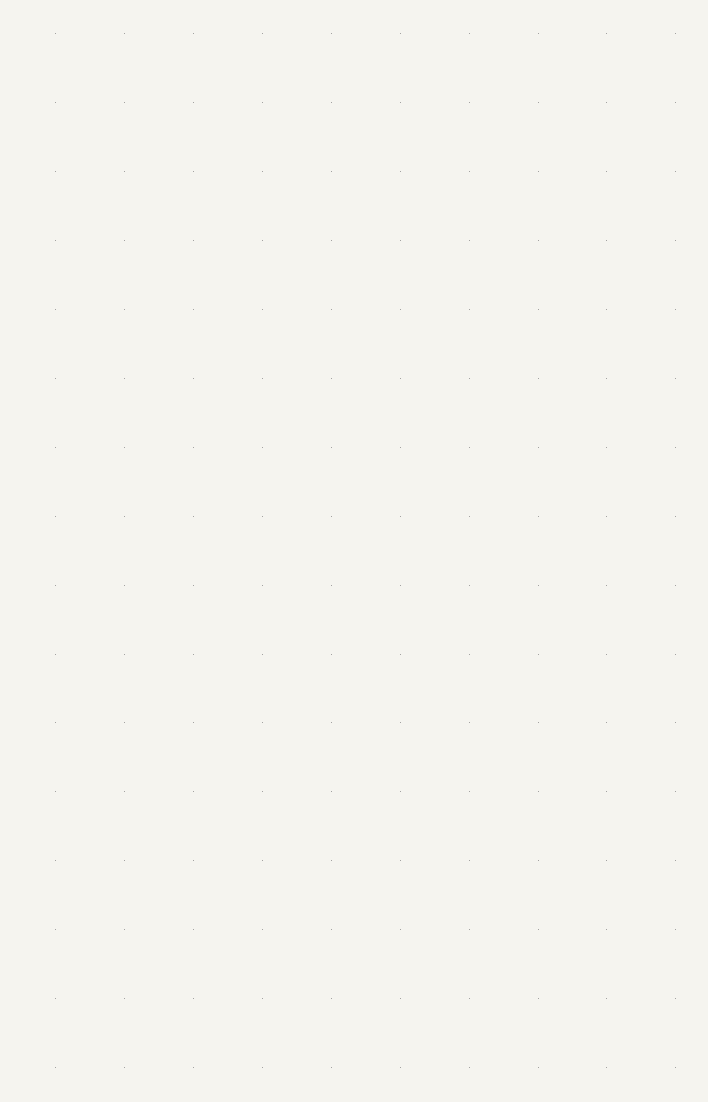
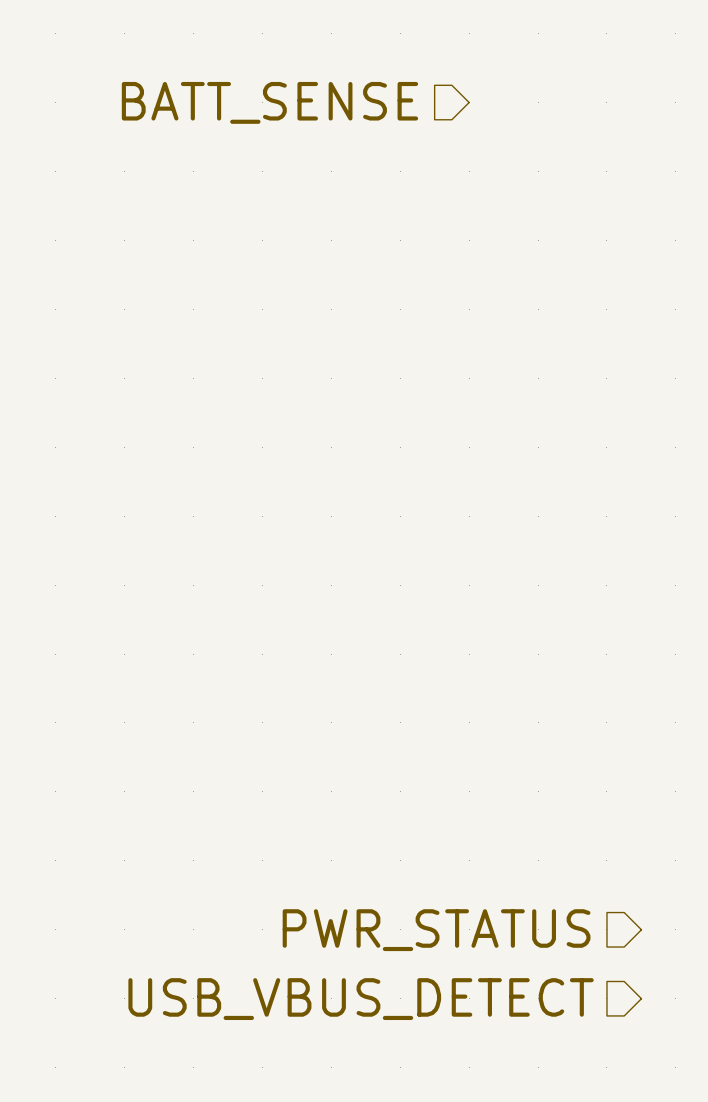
hierarchical label: none -> BATT_SENSE (269, 102)
hierarchical label: none -> PWR_STATUS (436, 930)
hierarchical label: none -> USB_VBUS_DETECT (361, 999)

